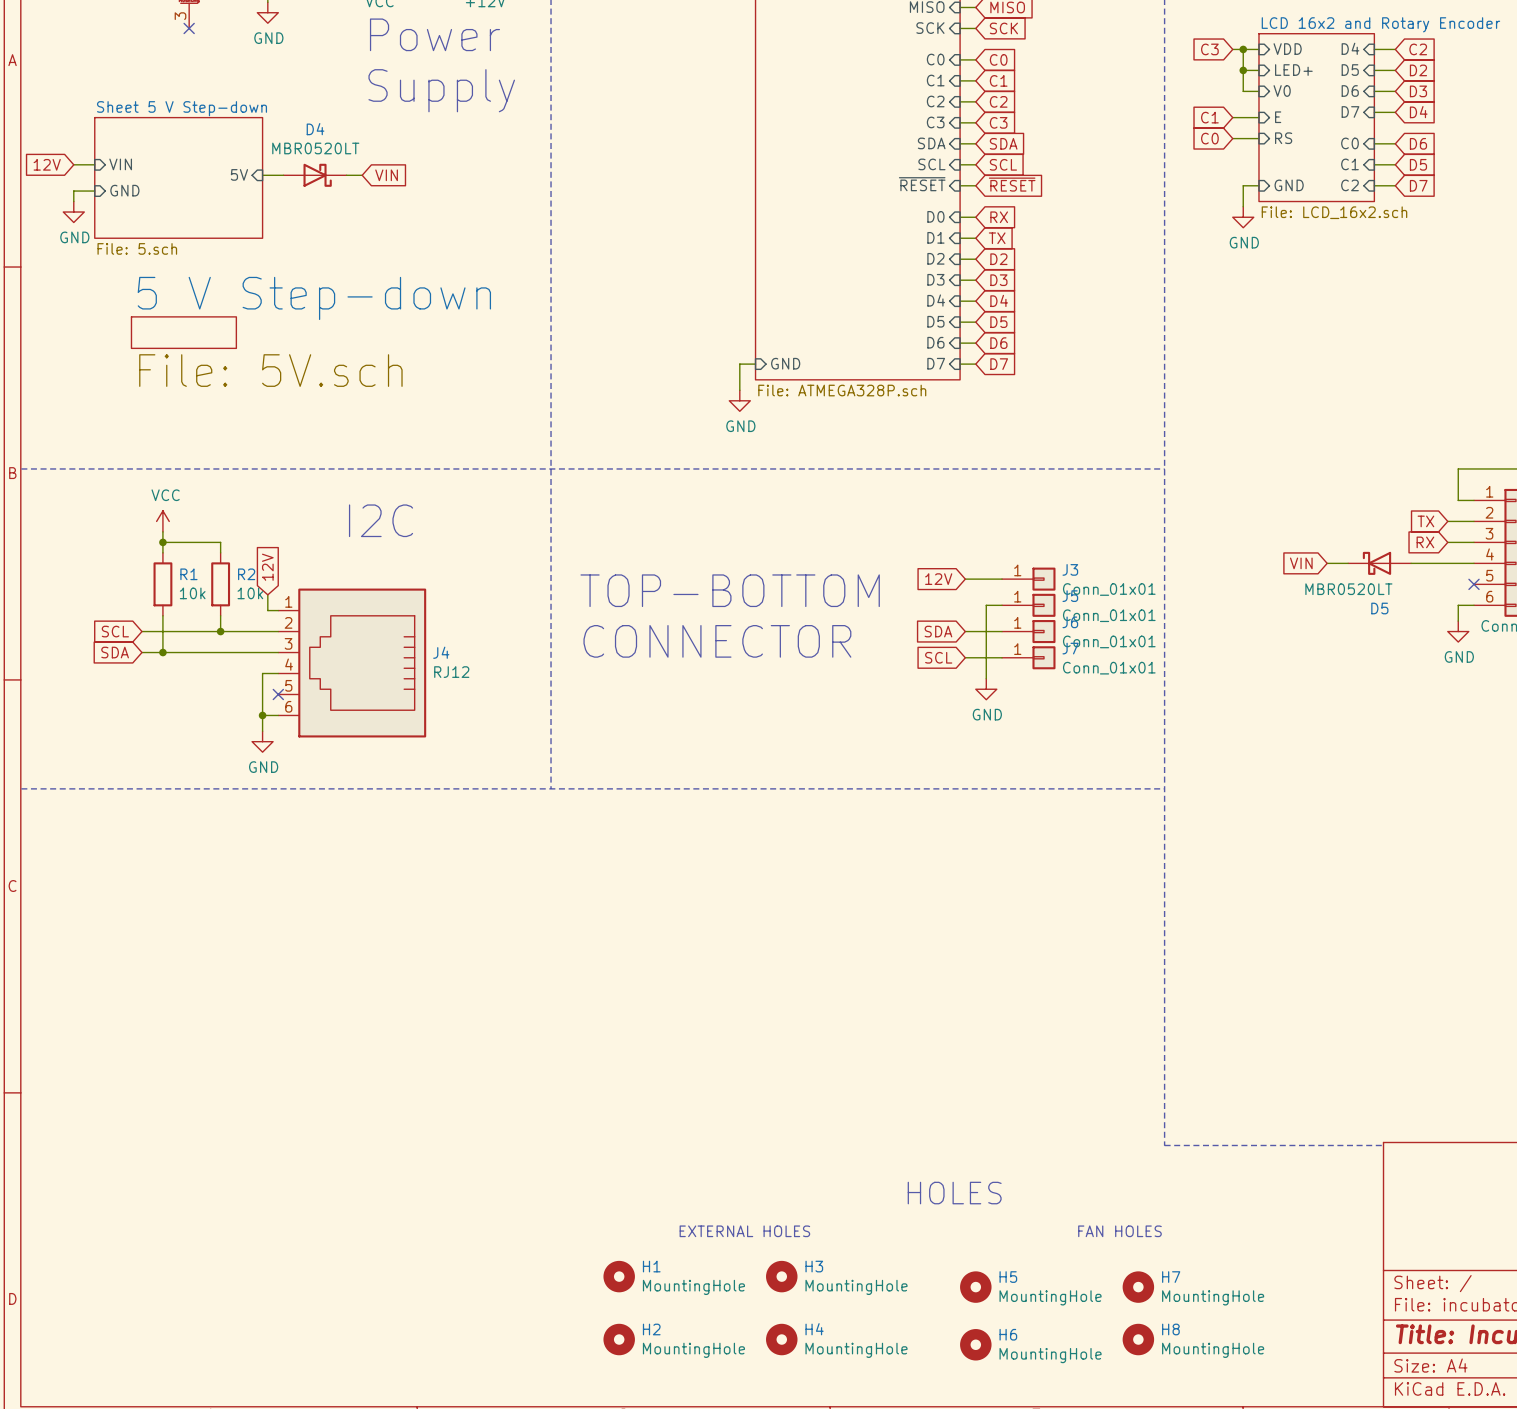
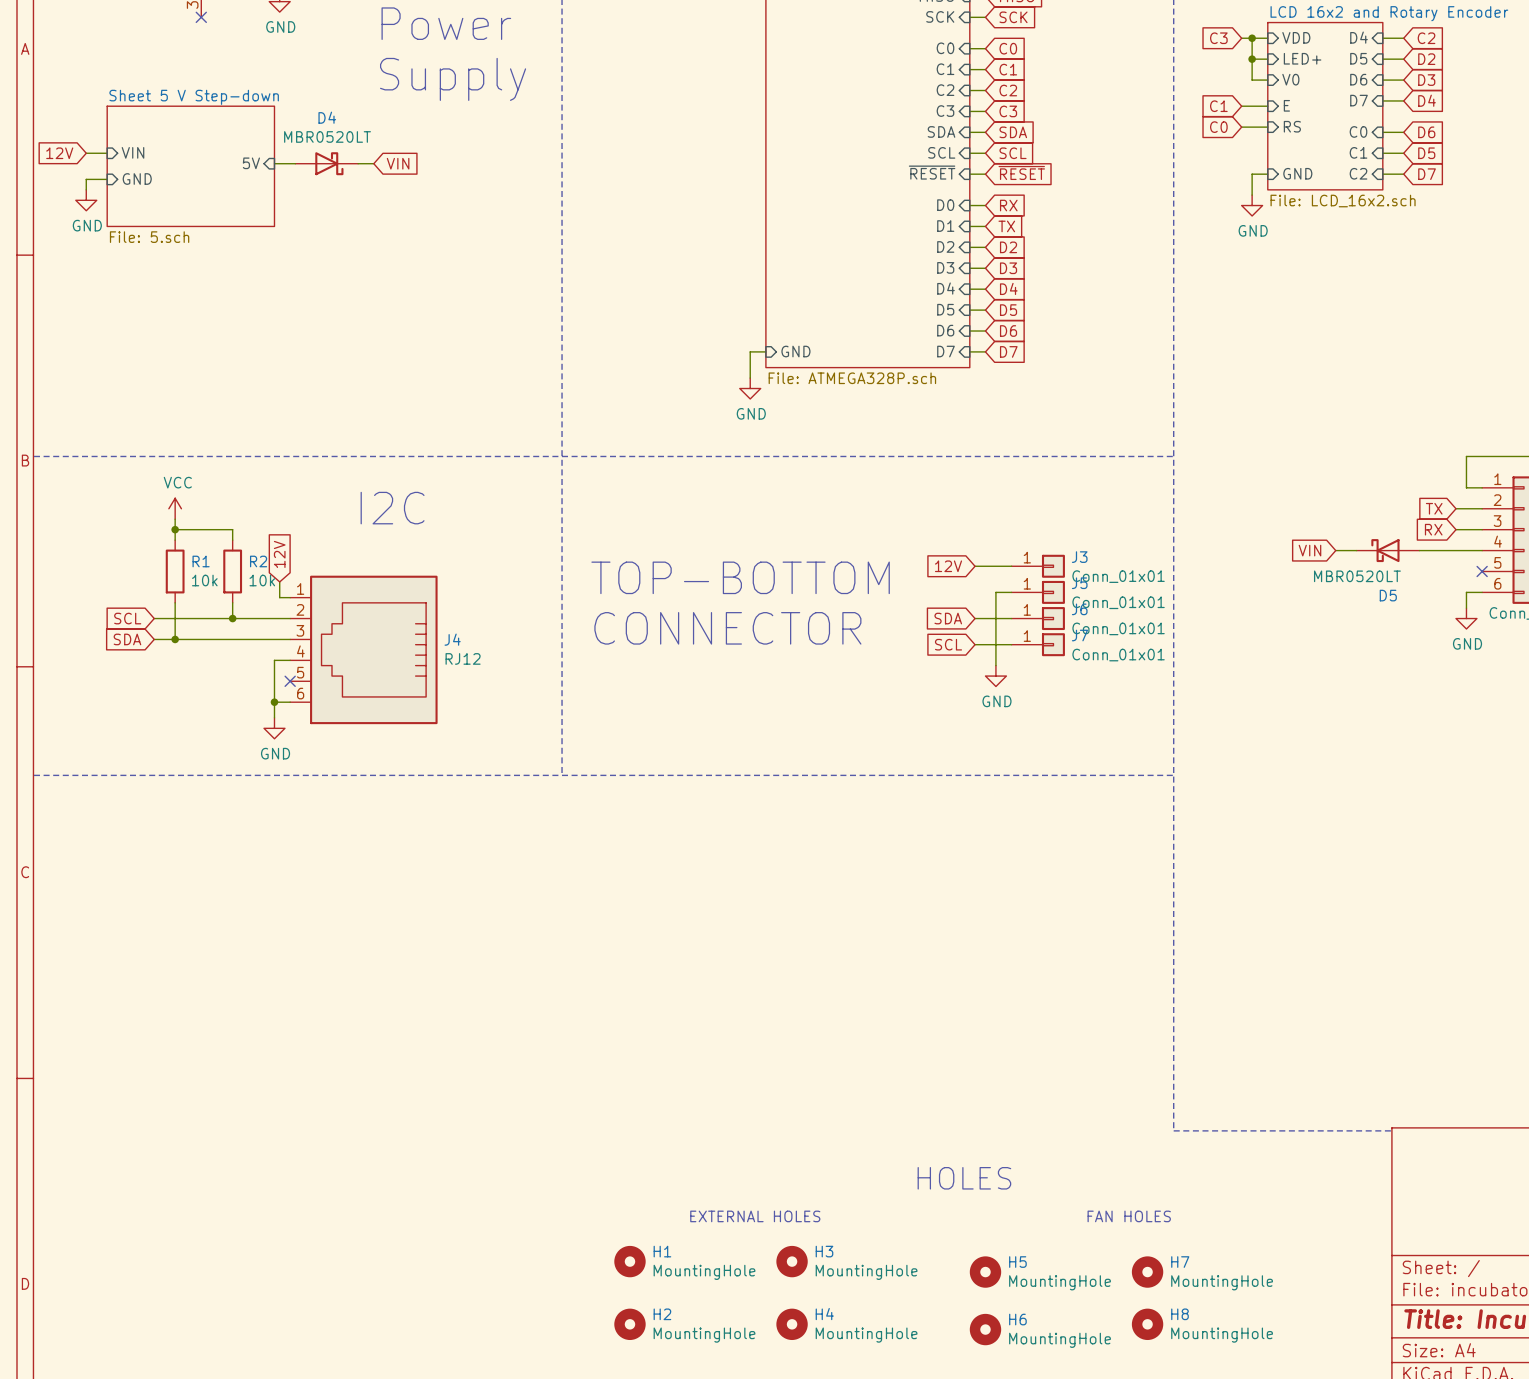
sheet 5 V Step-down: File: 5V.sch (183, 332) -> none

